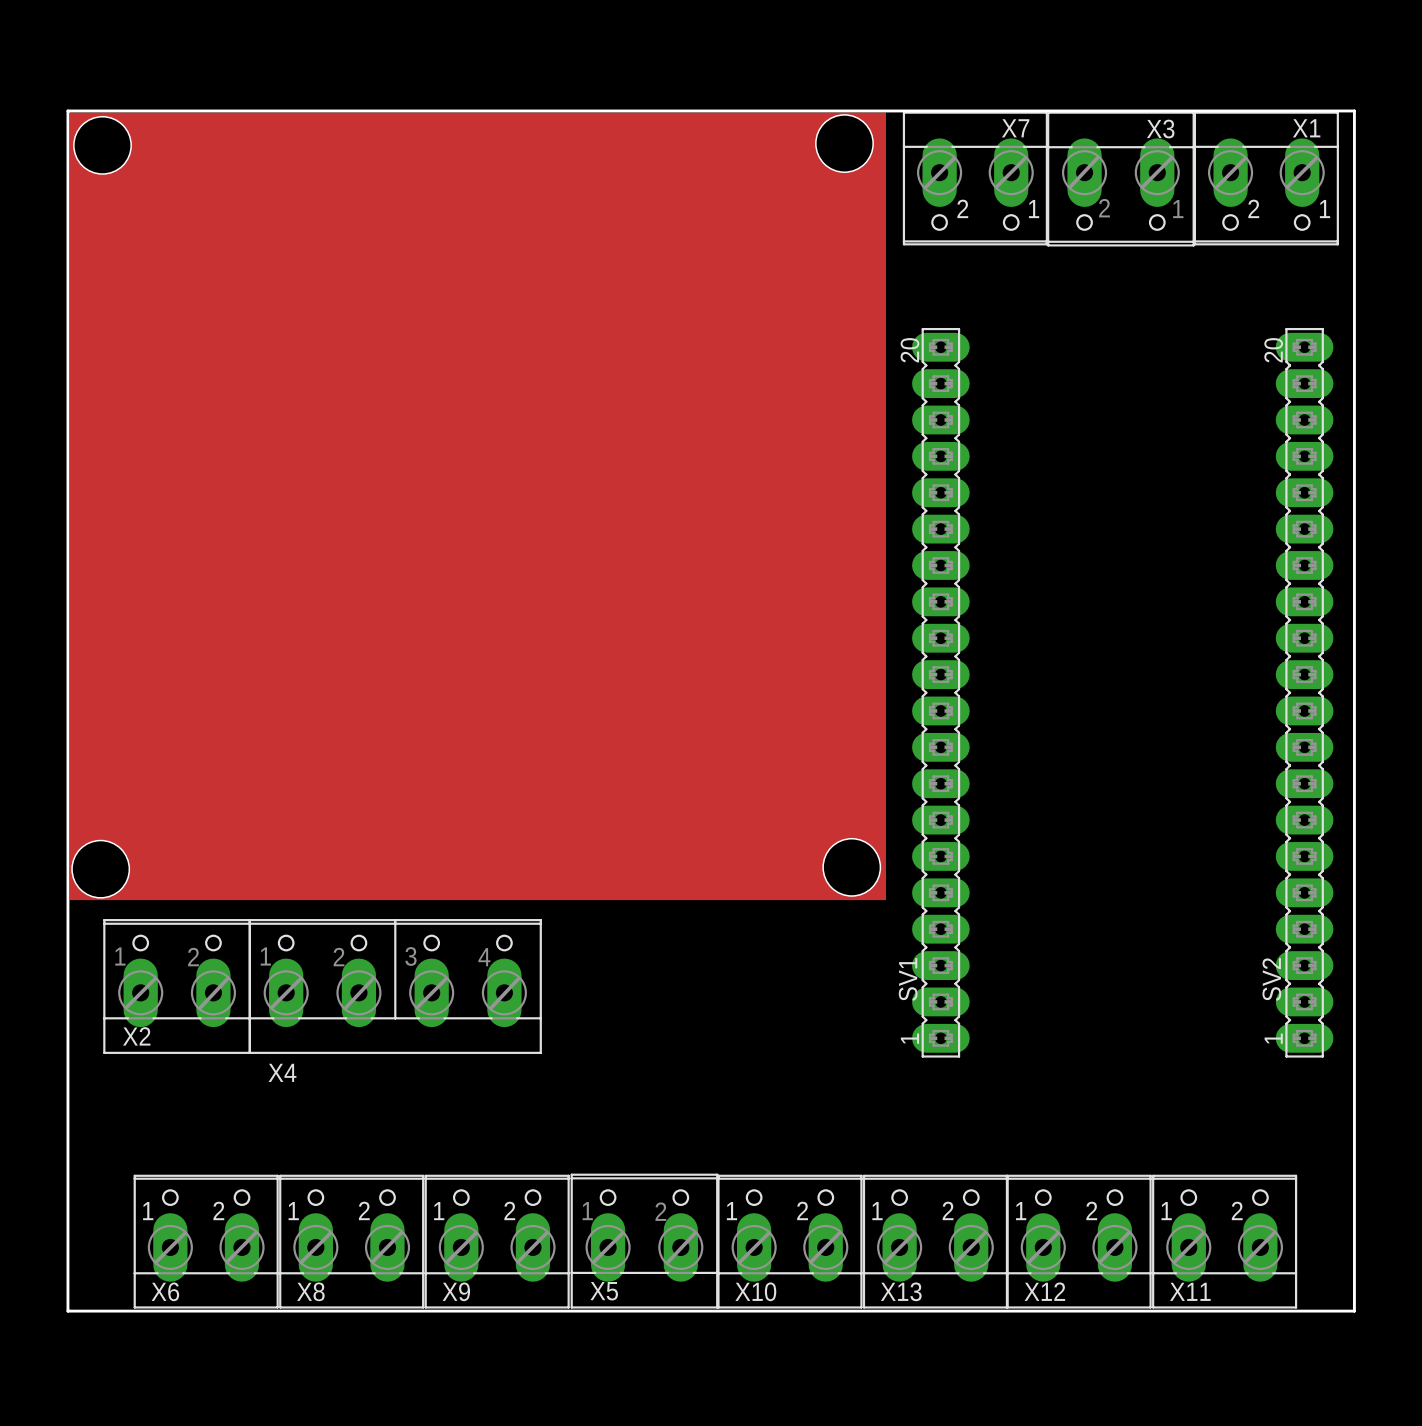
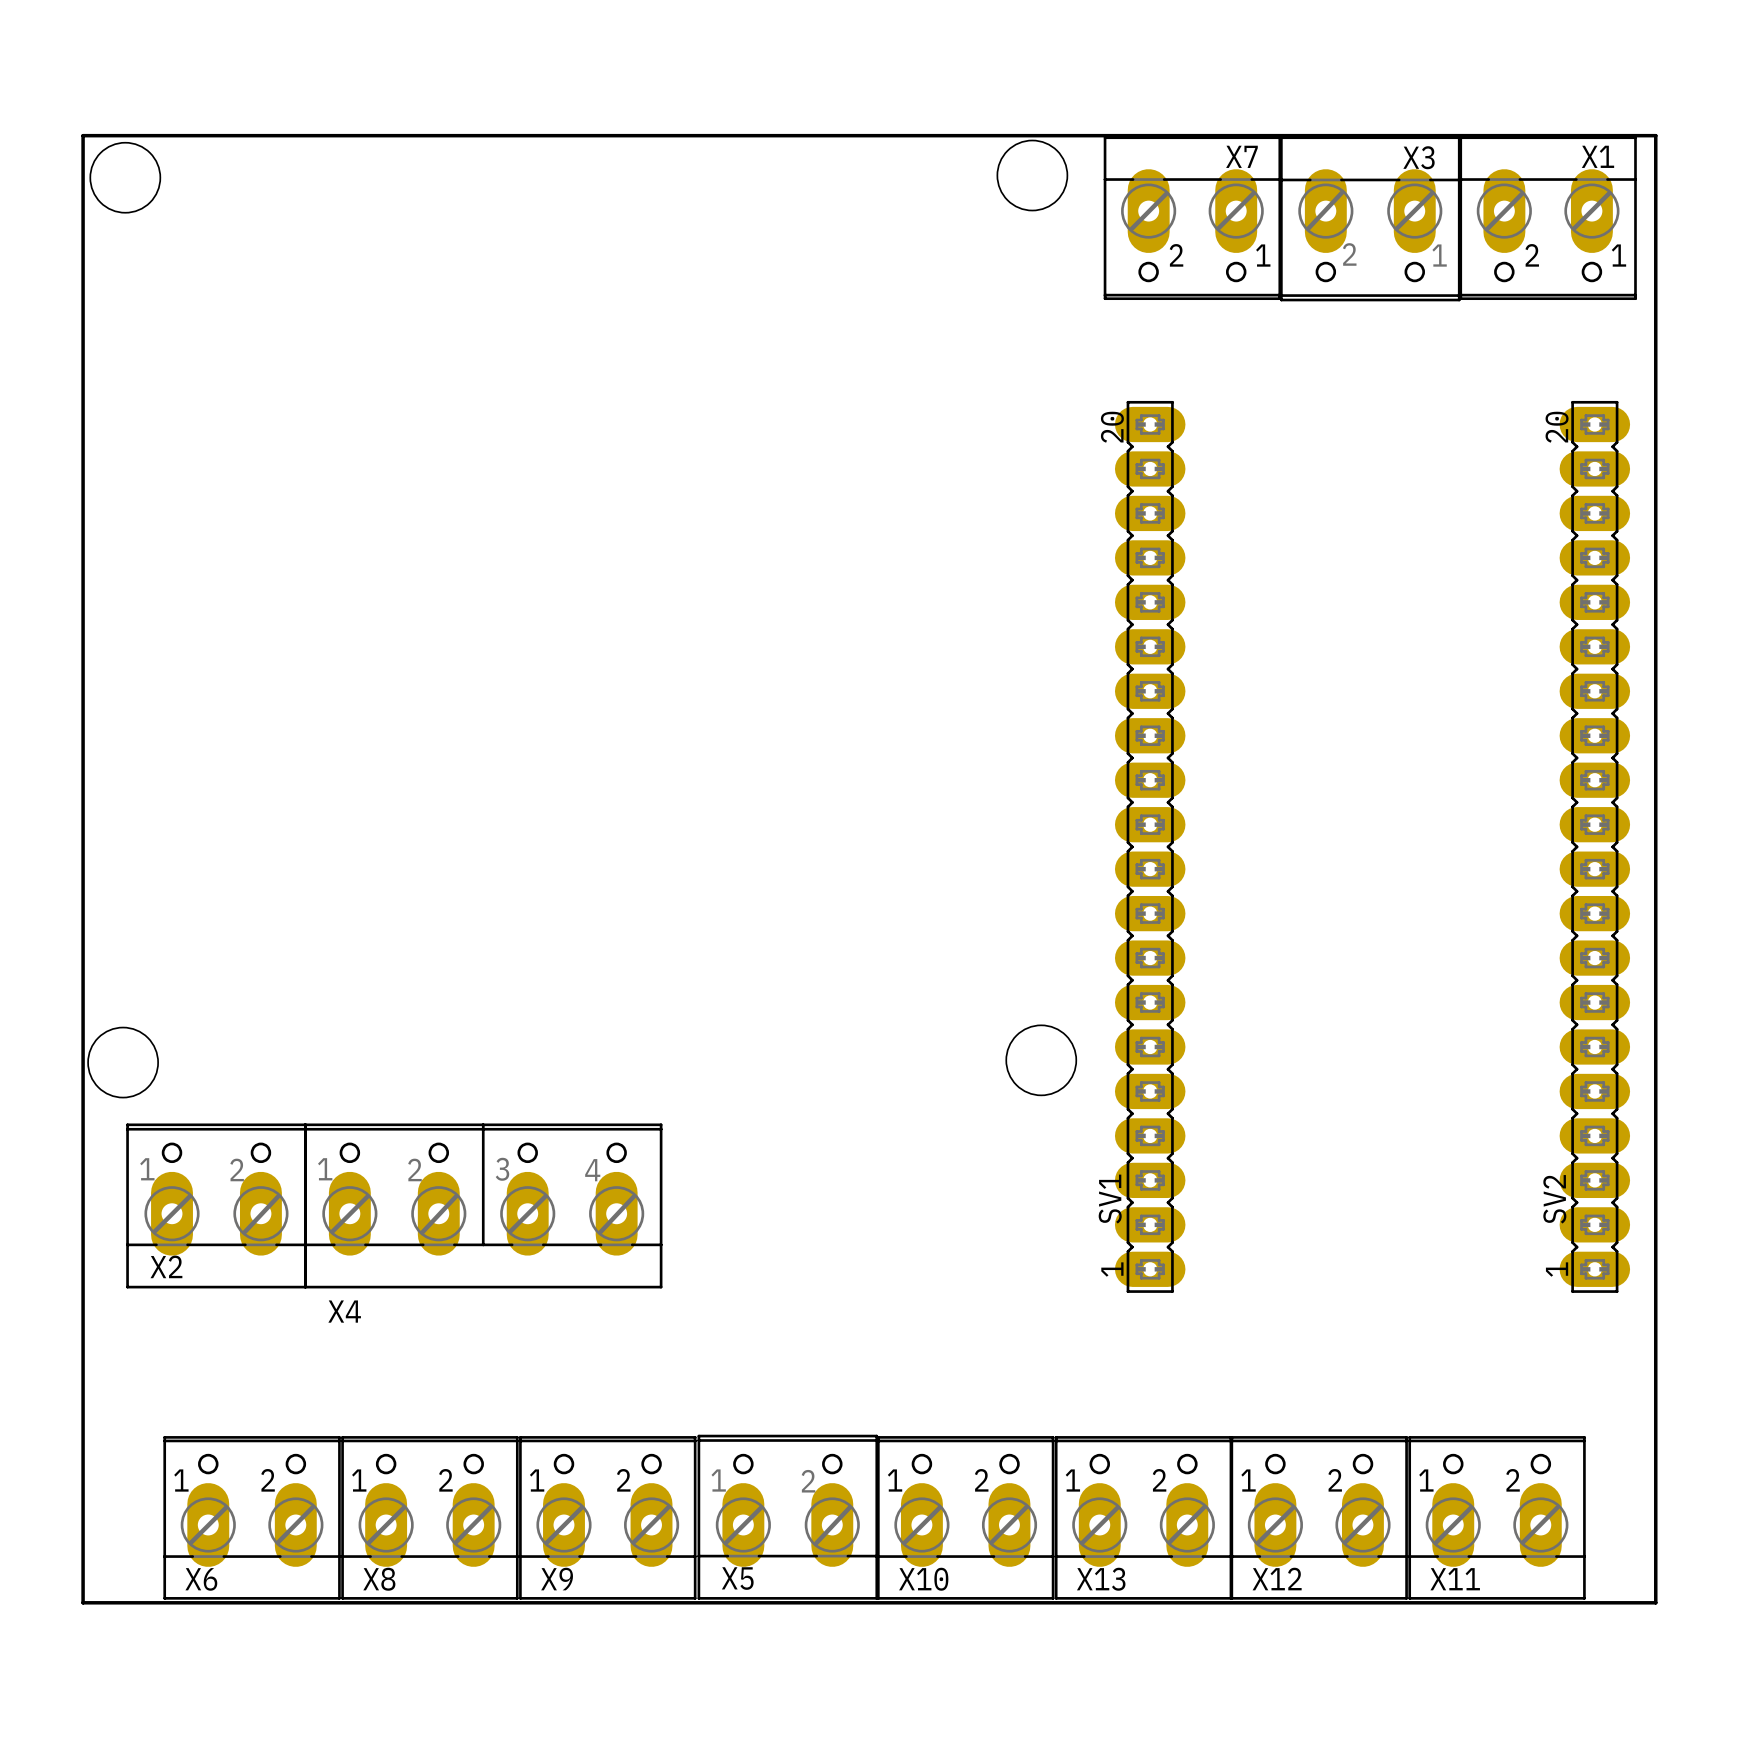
drawing: [69, 112, 886, 901] -> none

